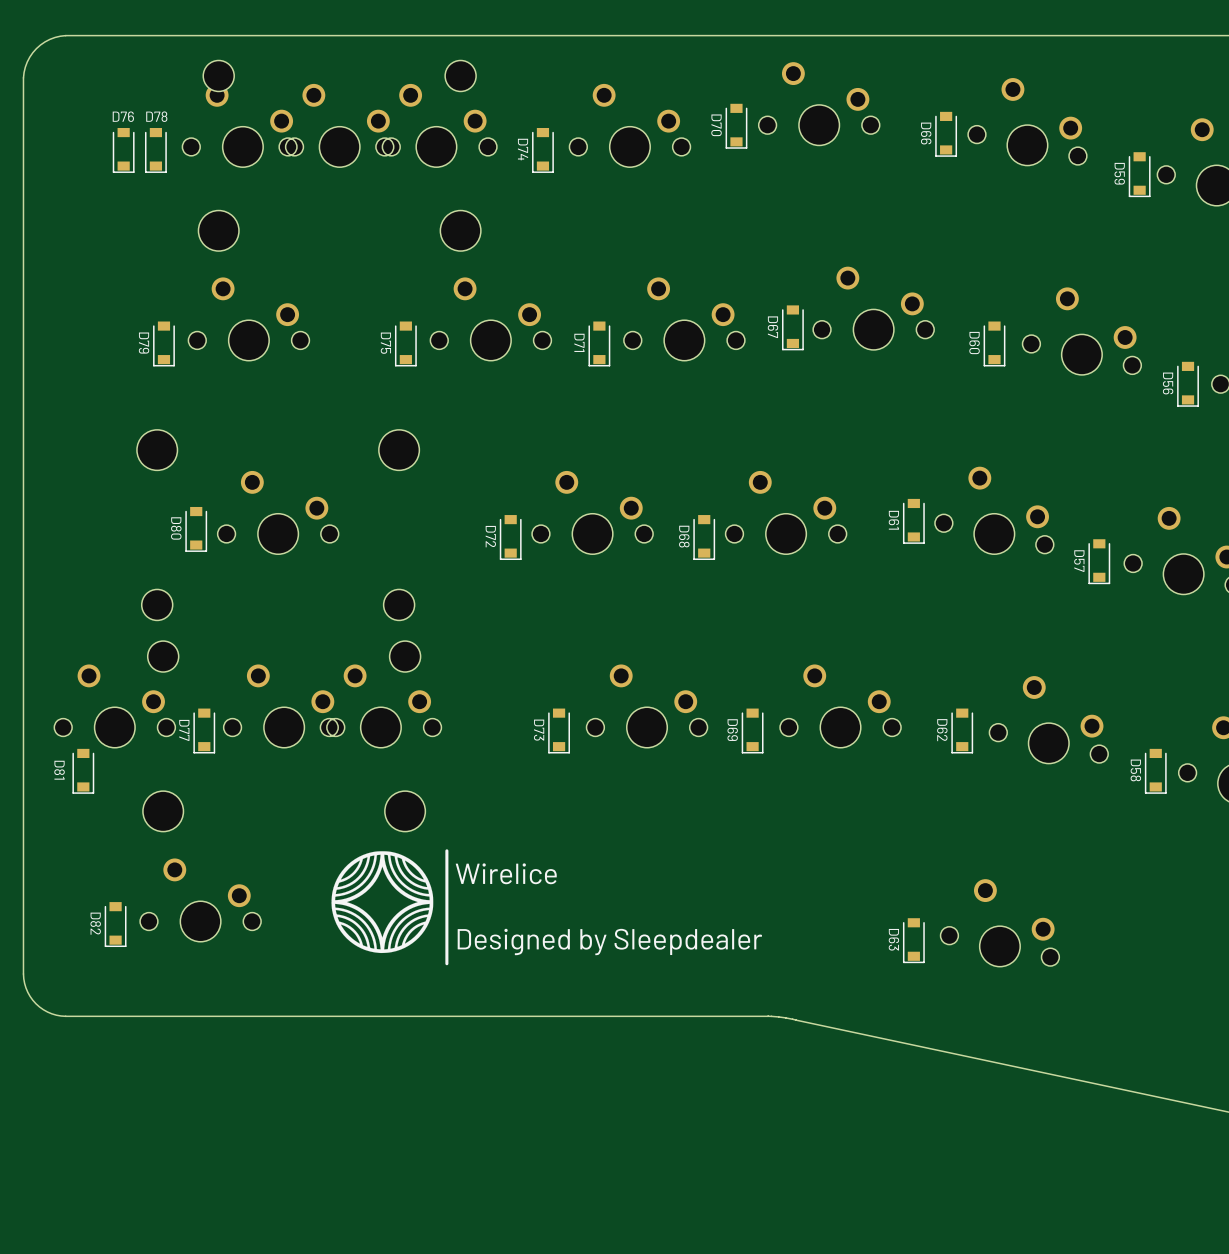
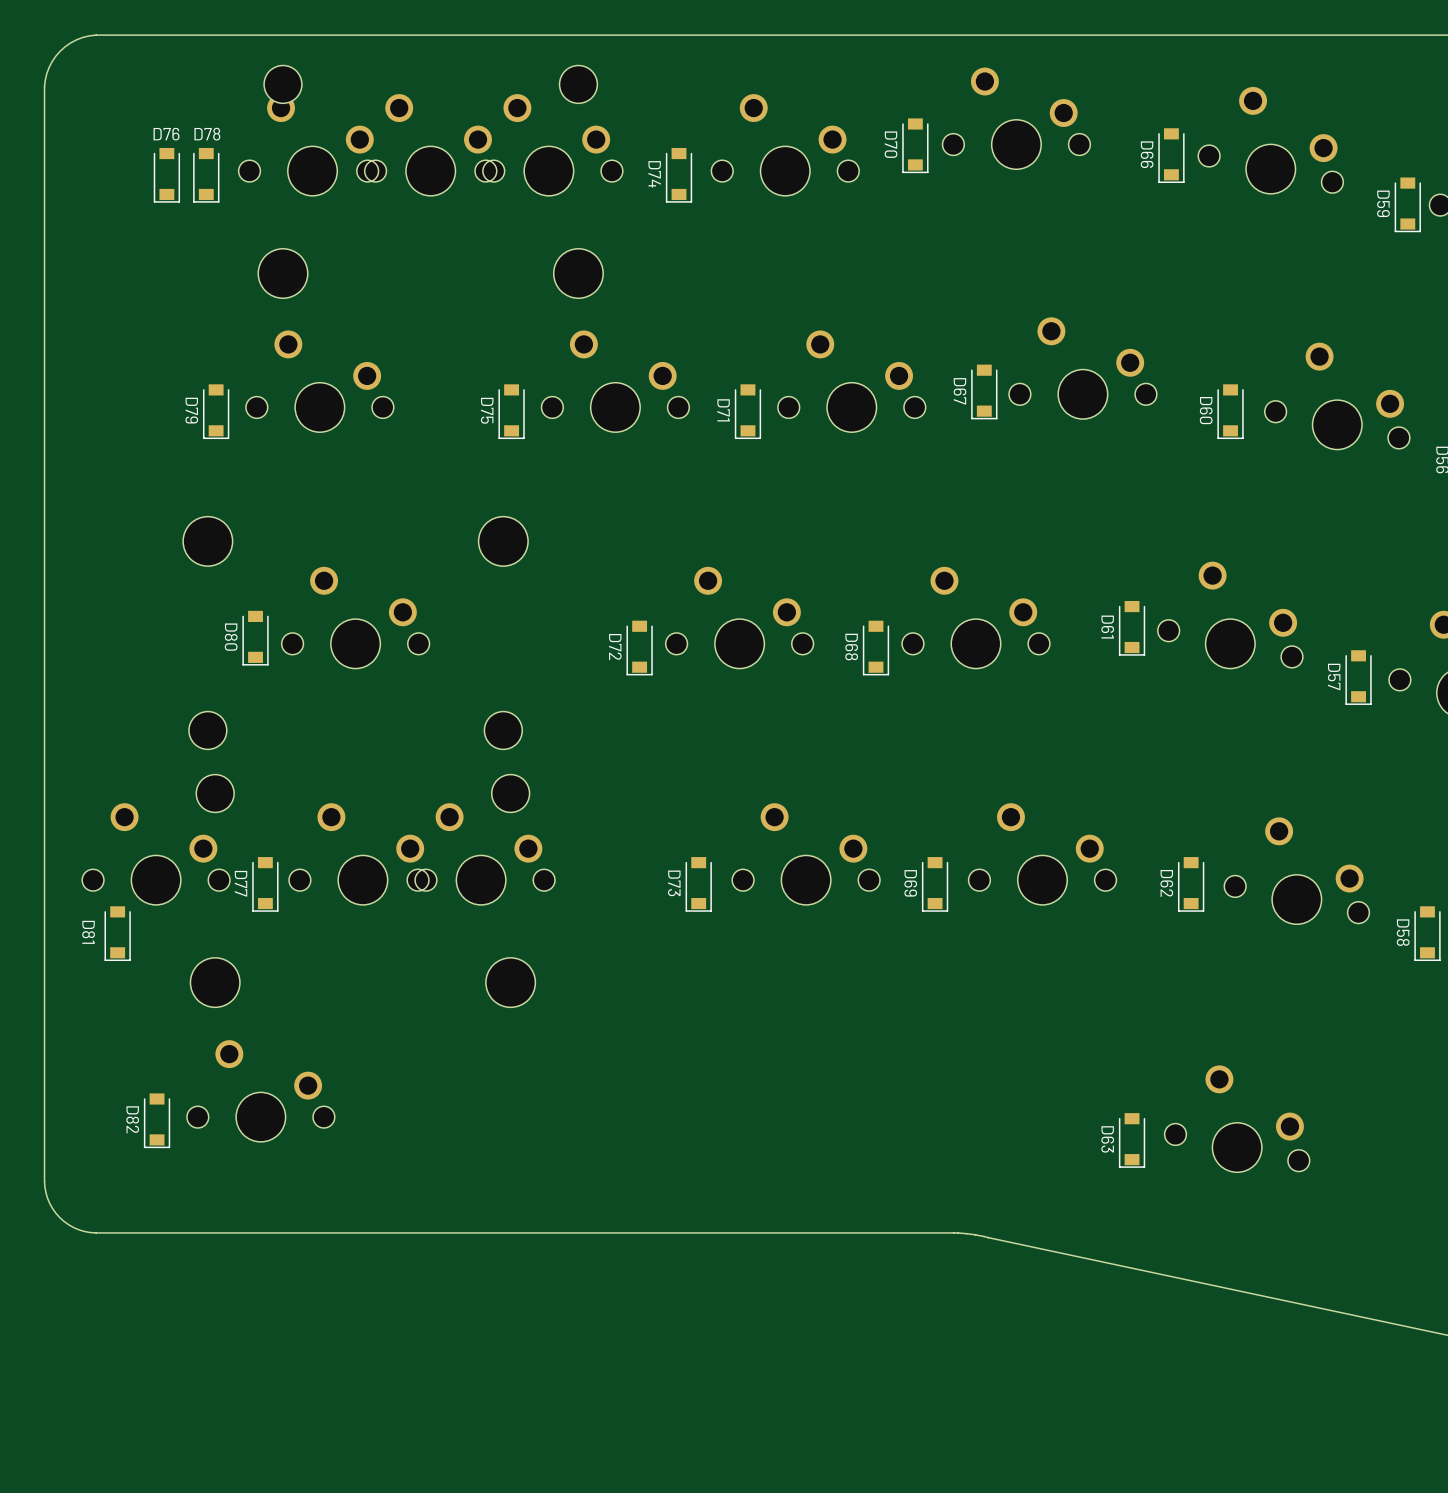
line: (446, 850) (446, 963) -> none
drawing: [331, 851, 434, 954] -> none
text: Wirelice (506, 873) -> none
text: Designed by Sleepdealer (609, 941) -> none

